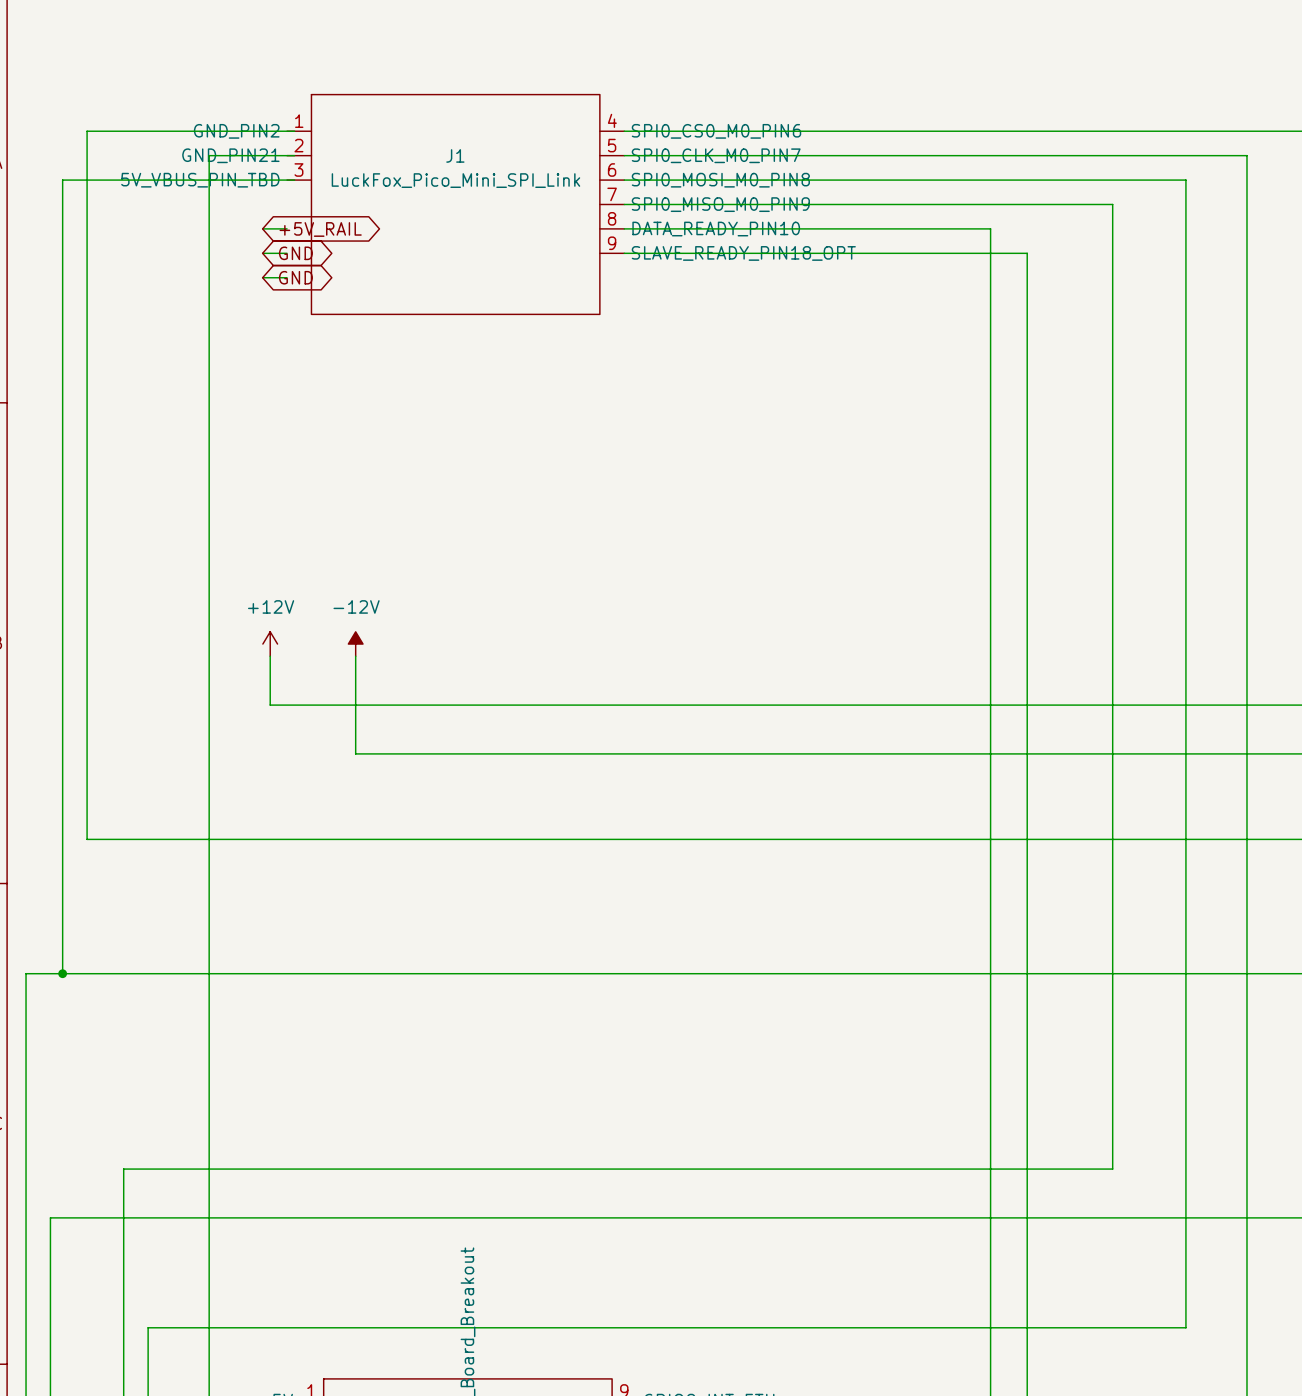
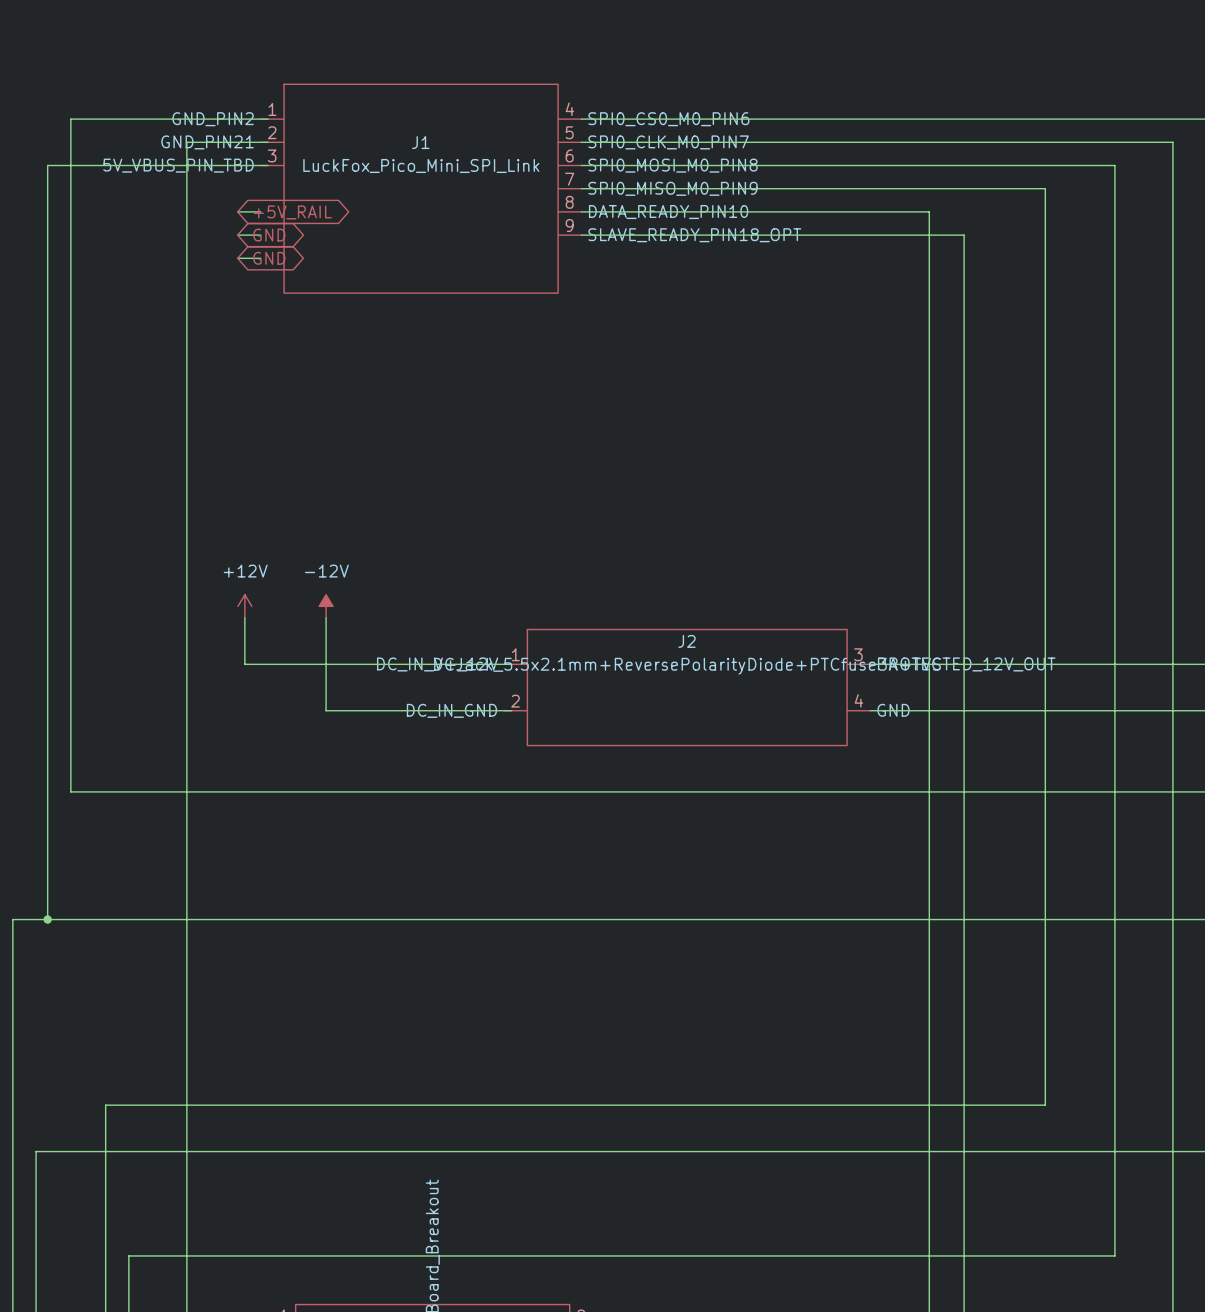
wire: (551, 705) (928, 705) -> none
J2: none -> DCJack_5.5x2.1mm+ReversePolarityDiode+PTCfuse3A+TVS (687, 687)
wire: (551, 753) (928, 753) -> none

